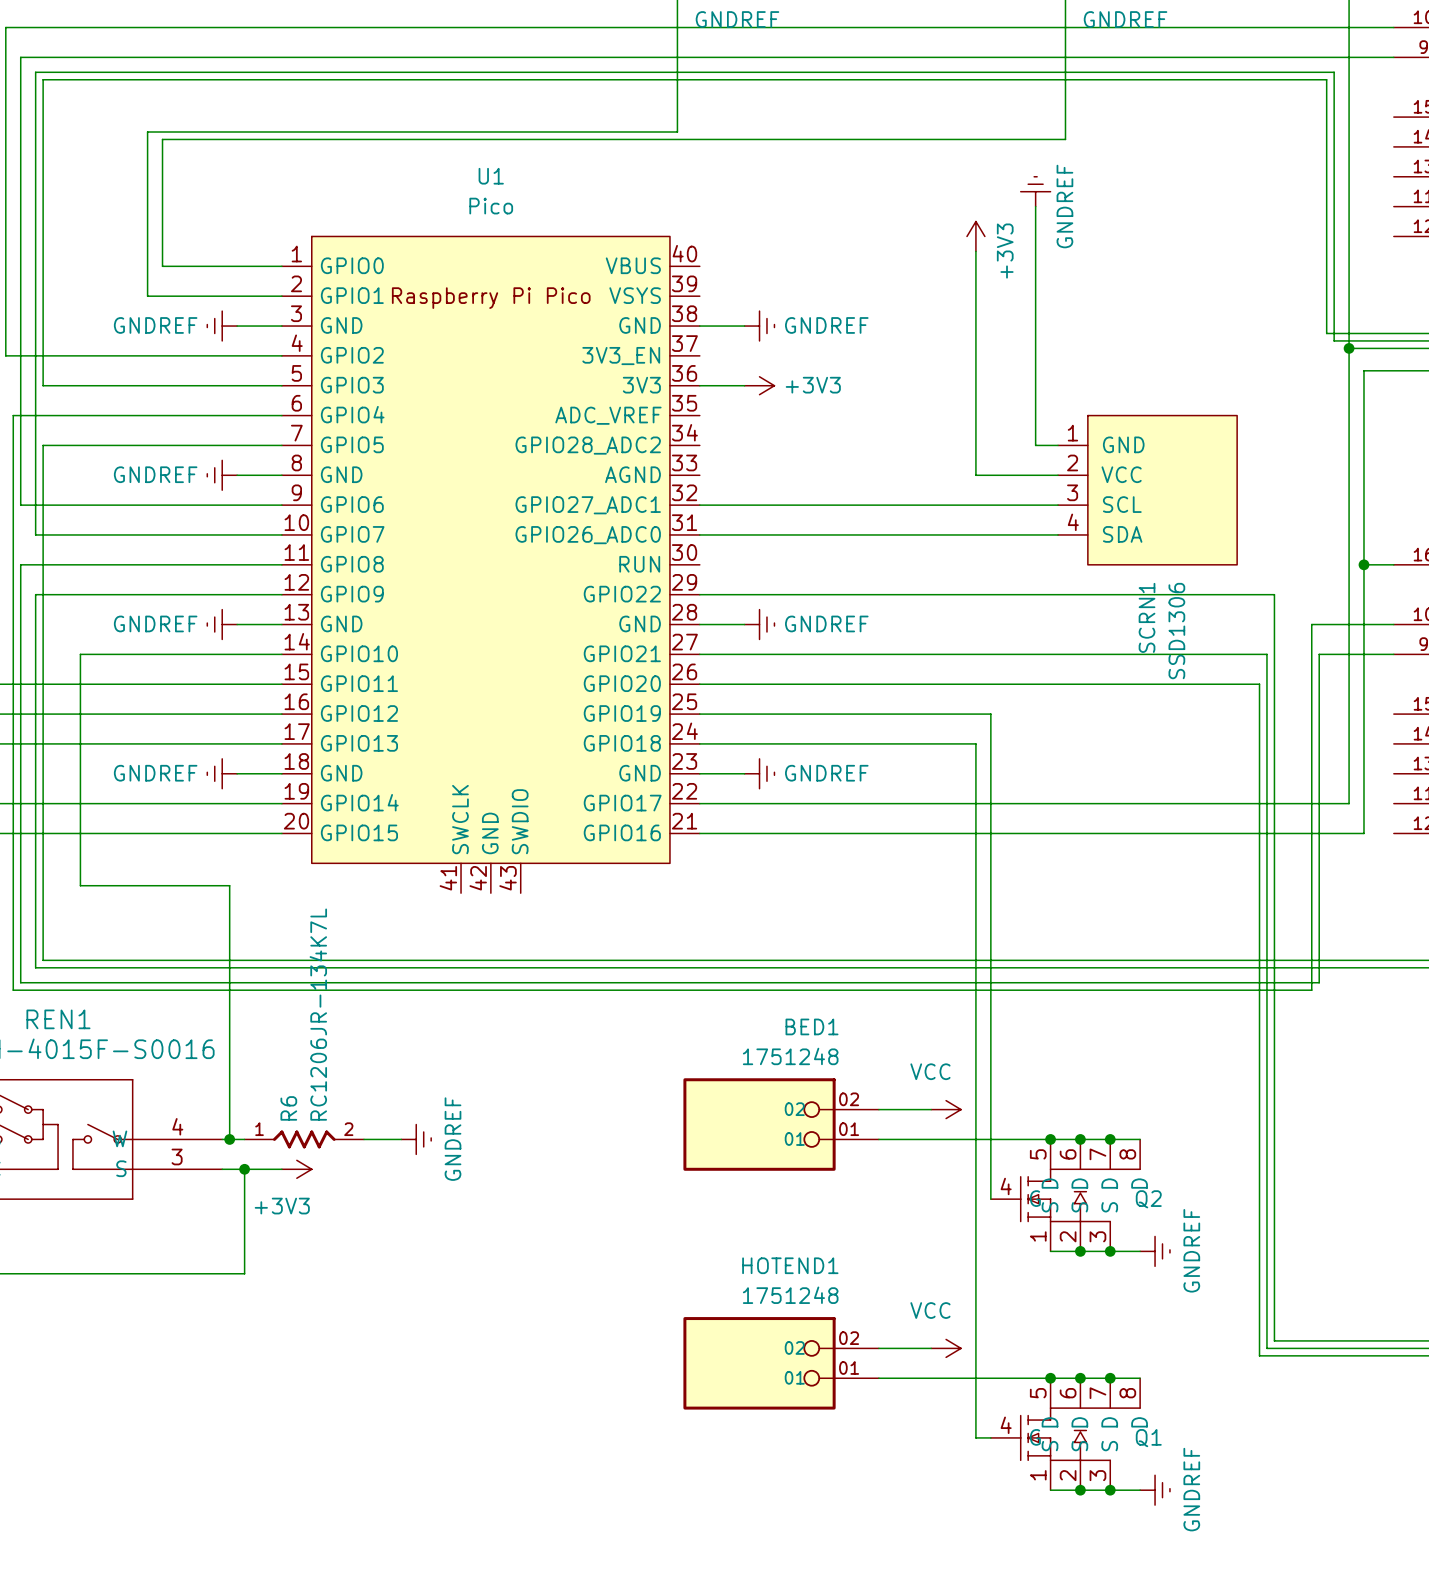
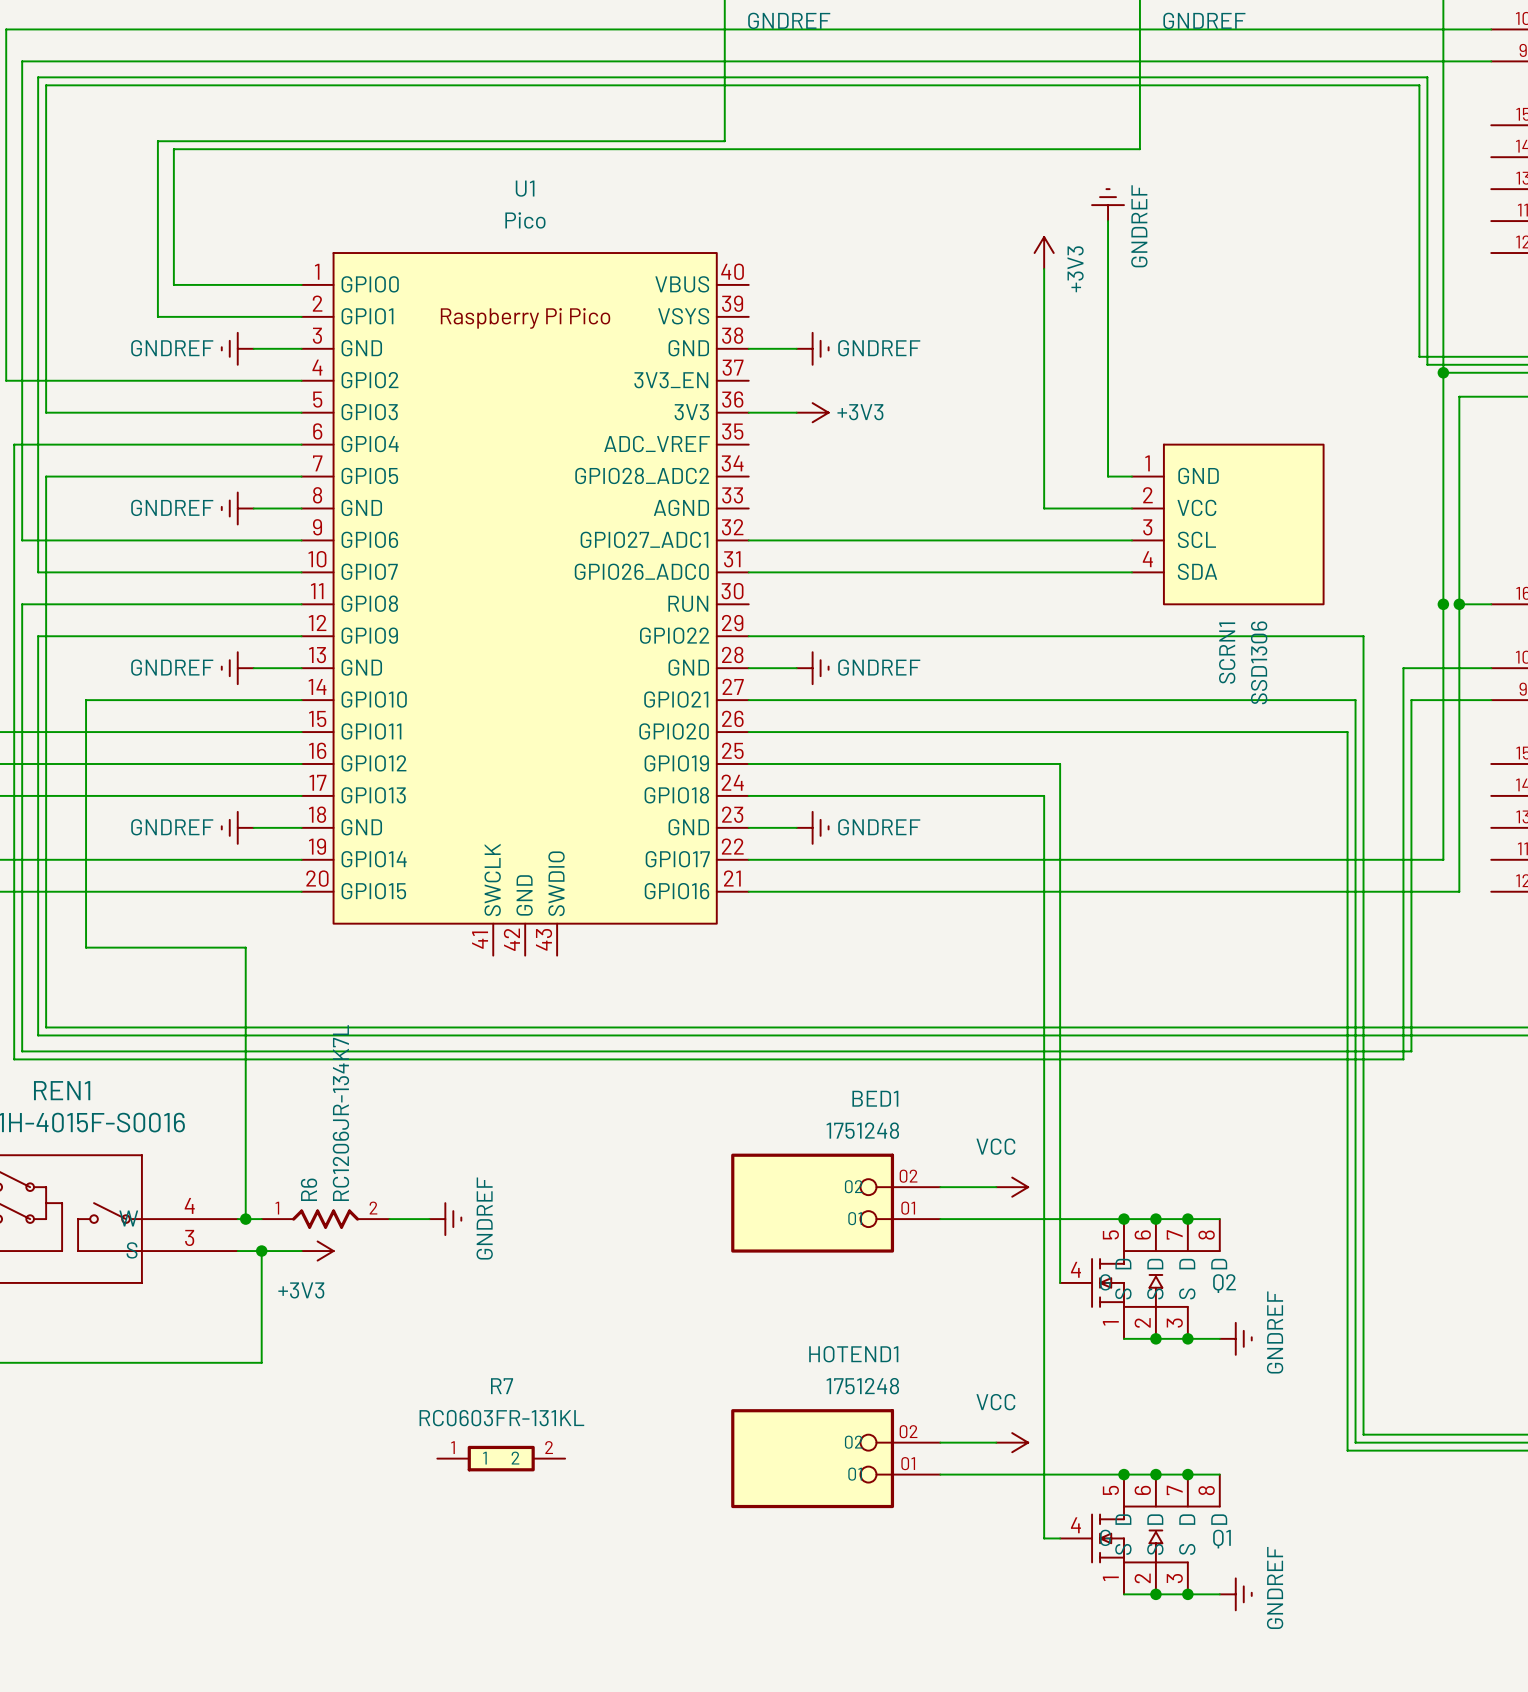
junction: none -> (1443, 604)
R7: none -> RC0603FR-131KL (501, 1458)

